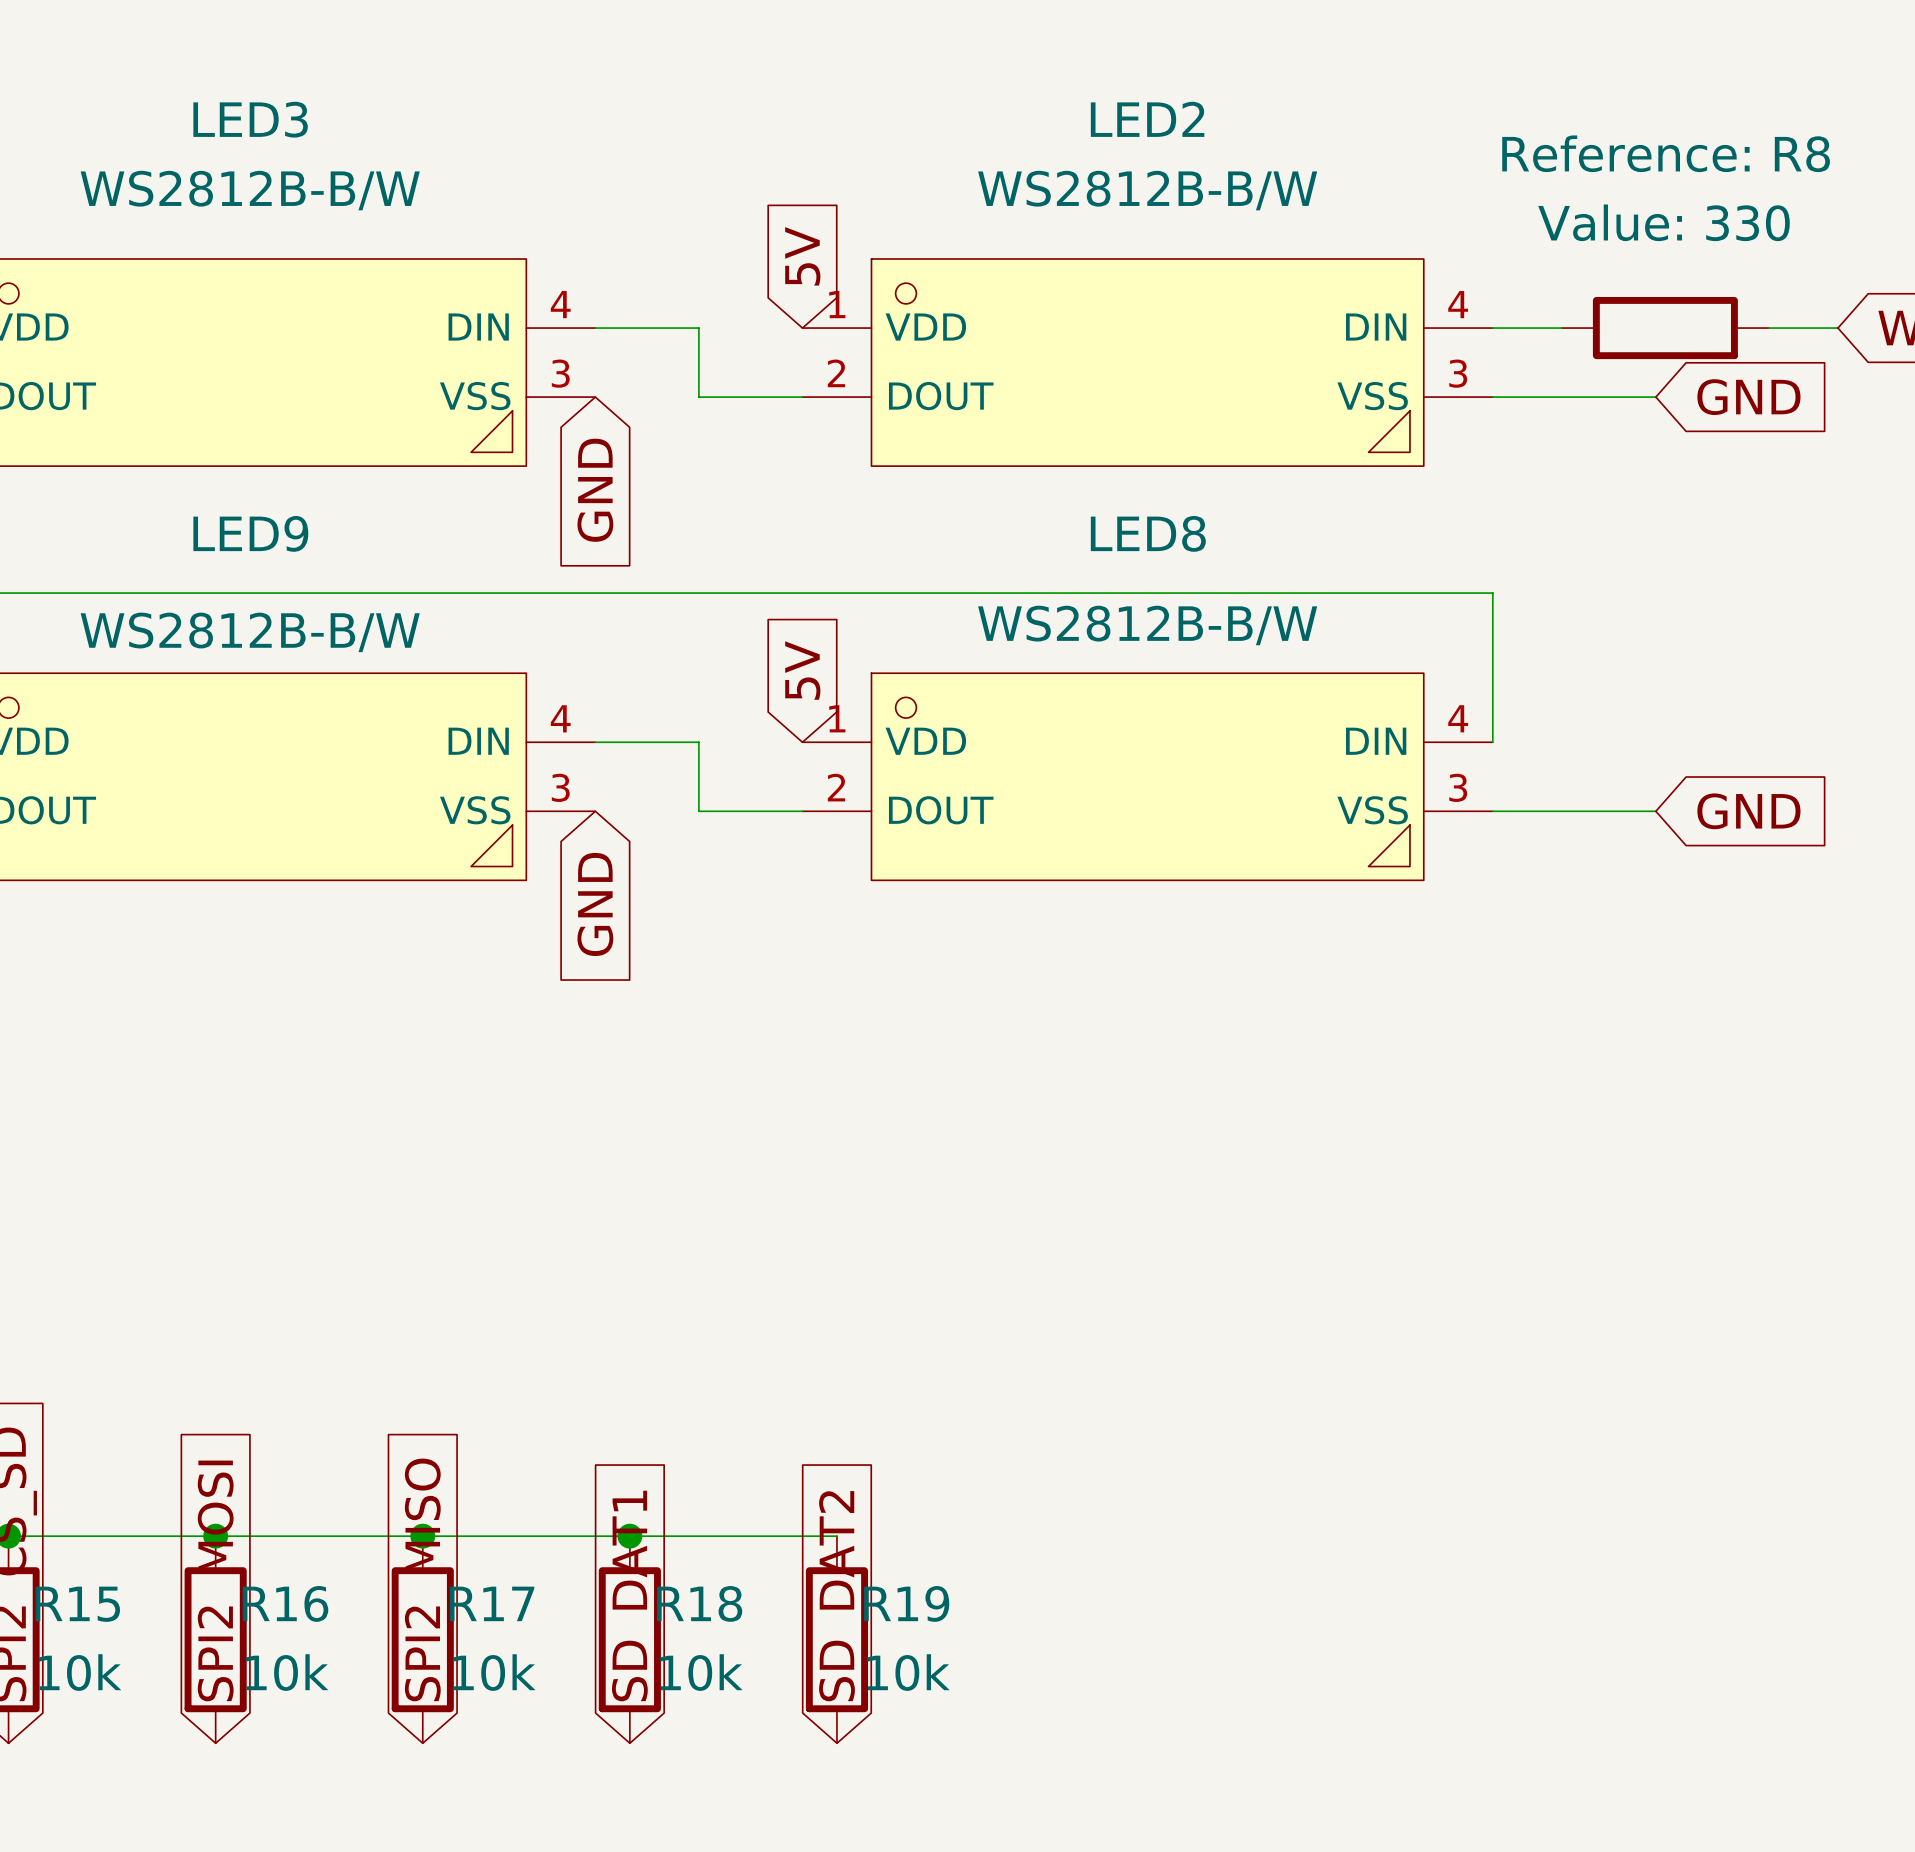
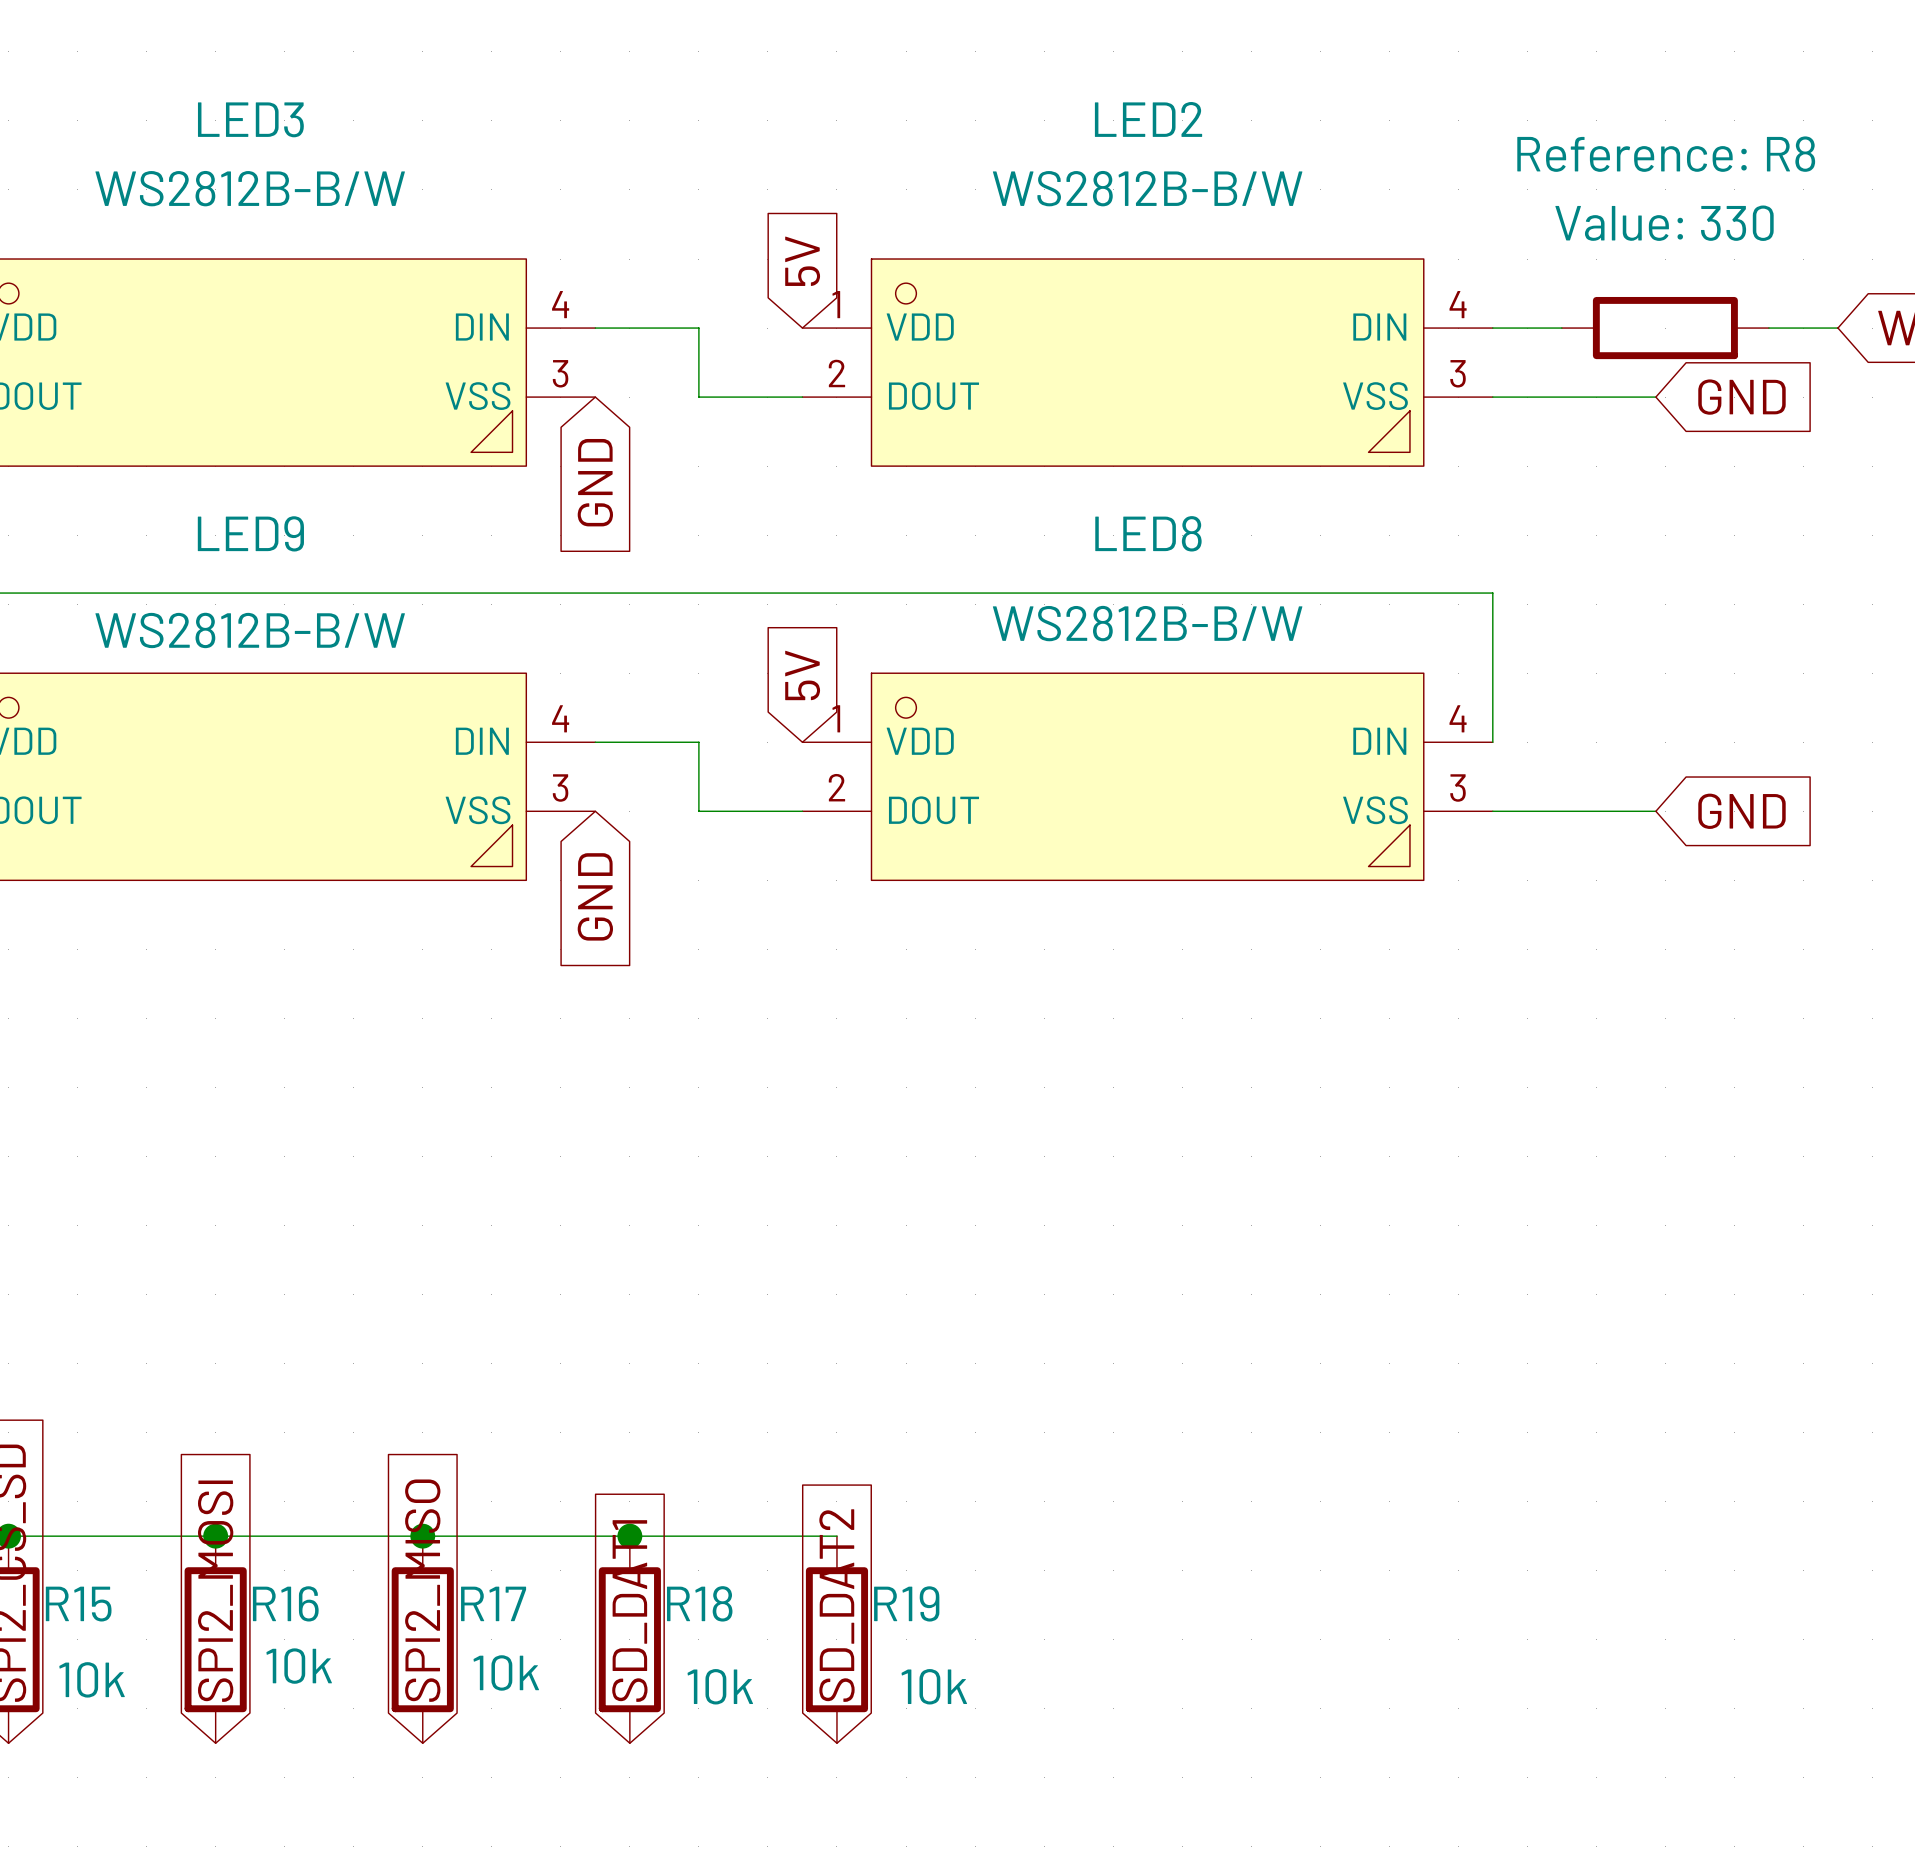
R15 value position: 10k (80, 1672) -> 10k (92, 1679)
R16 value position: 10k (287, 1672) -> 10k (299, 1666)
R17 value position: 10k (494, 1672) -> 10k (506, 1672)
R18 value position: 10k (701, 1672) -> 10k (720, 1686)
R19 value position: 10k (908, 1672) -> 10k (934, 1686)

